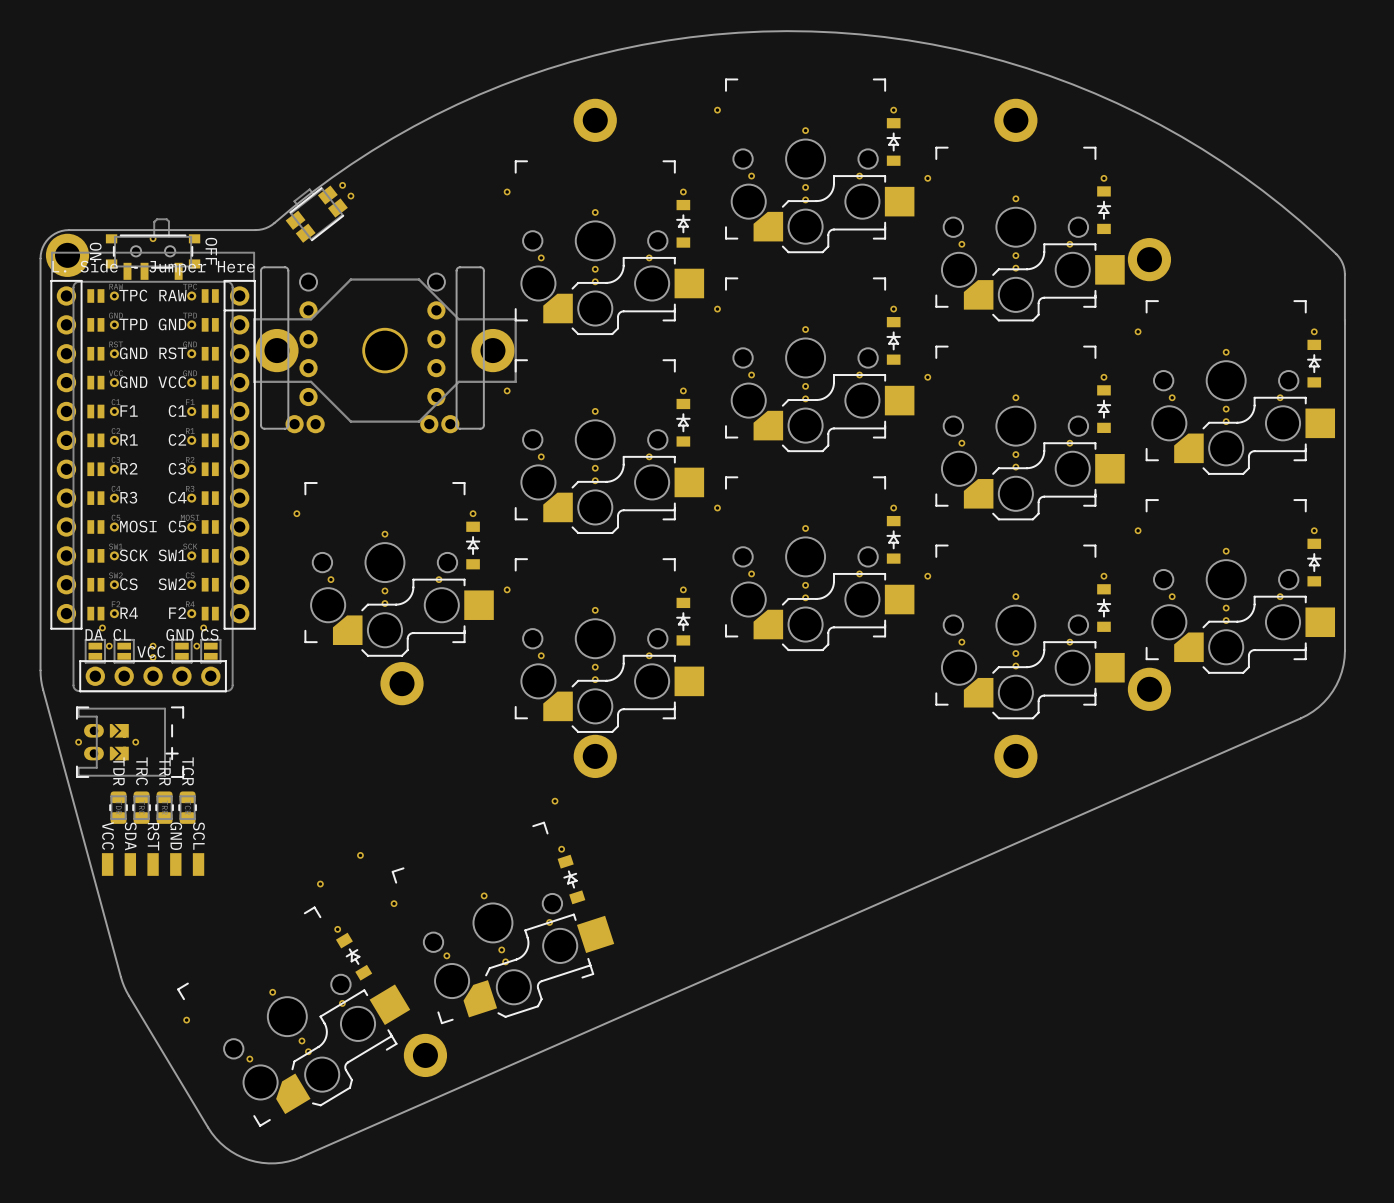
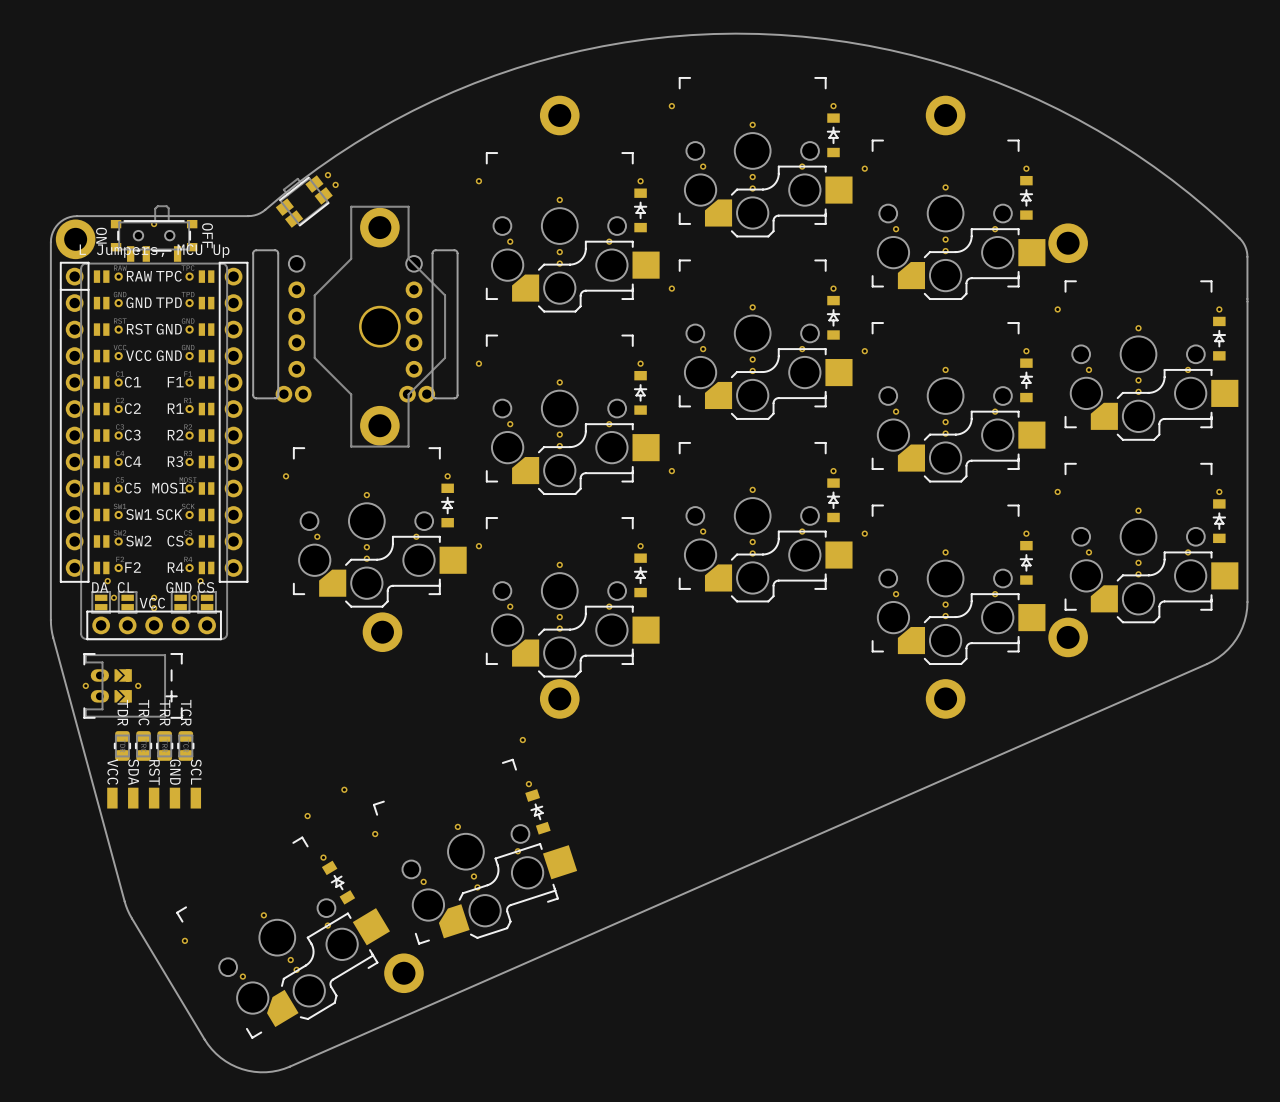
part rotation: 0° (384, 350) -> 90° clockwise (379, 326)
part: (153, 440) -> none
part: none -> (154, 422)

